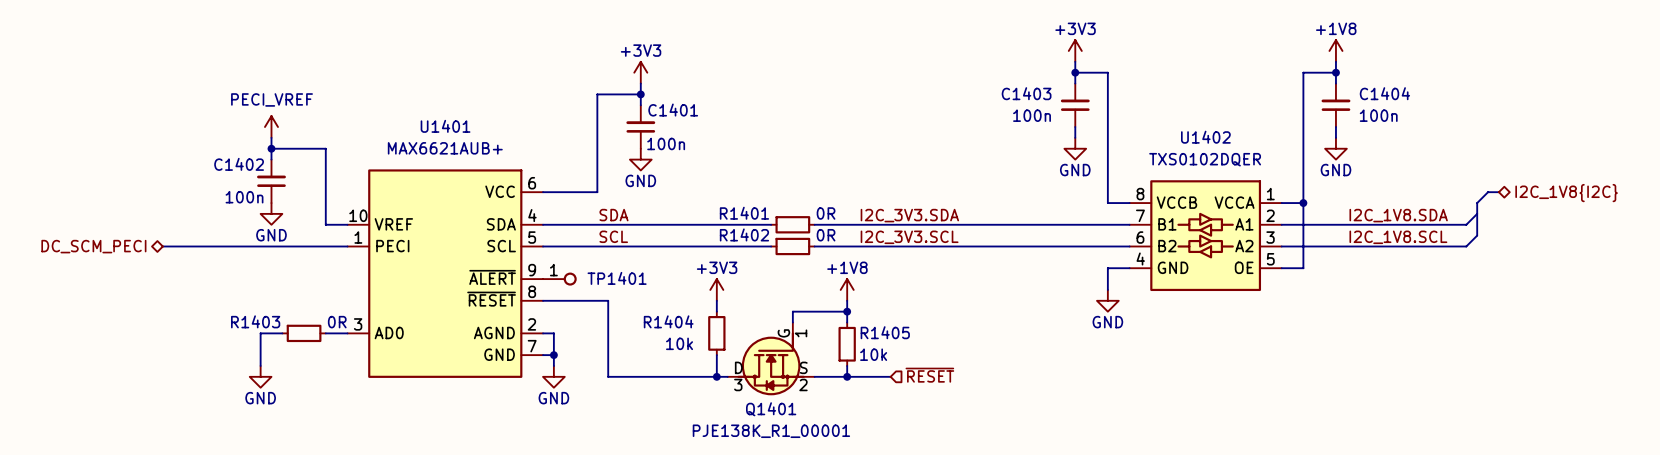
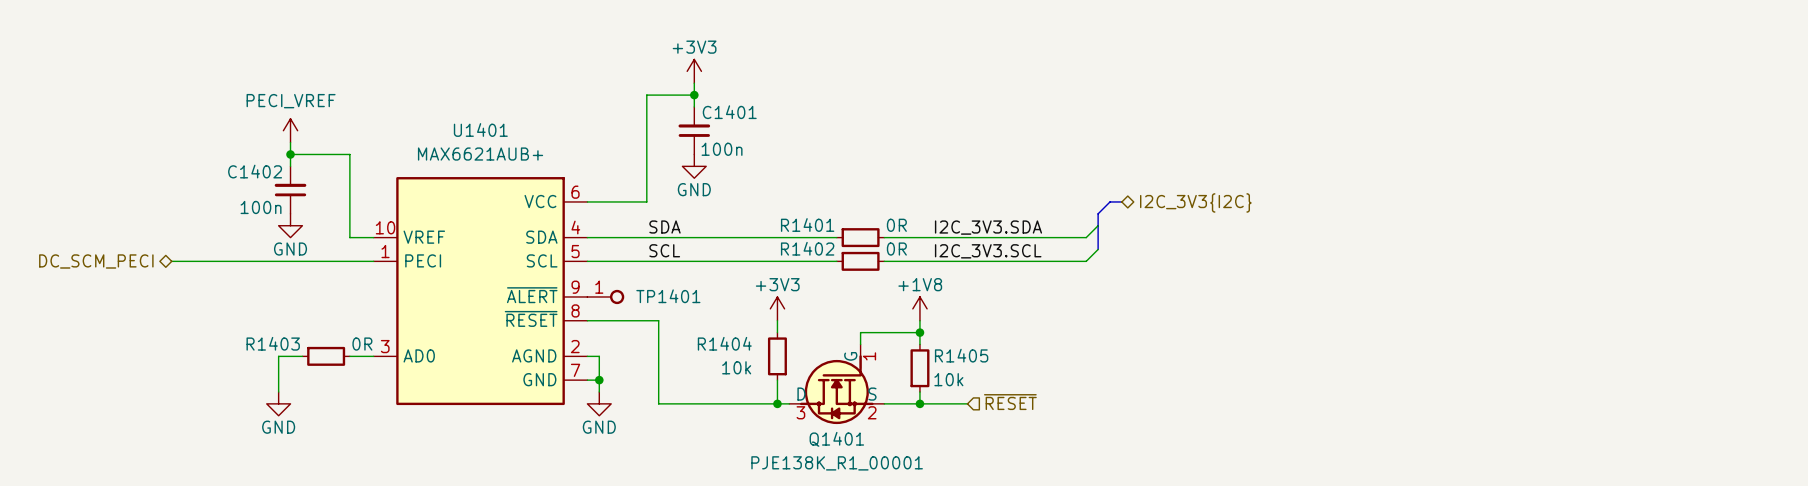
power symbol: +3V3 (1075, 50) -> none
power symbol: +1V8 (1335, 50) -> none
wire: (1075, 61) (1075, 83) -> none
wire: (1335, 61) (1335, 83) -> none
wire: (1075, 72) (1107, 72) (1107, 203) (1129, 203) -> none
junction: (1075, 72) -> none
wire: (1335, 72) (1303, 72) (1303, 268) (1281, 268) -> none
junction: (1335, 72) -> none
C1403: (1075, 105) -> none
C1404: (1335, 105) -> none
wire: (1075, 127) (1075, 137) -> none
wire: (1335, 127) (1335, 137) -> none
power symbol: GND (1075, 148) -> none
power symbol: GND (1335, 148) -> none
bus: none -> (1121, 201) (1109, 201) (1098, 213) (1098, 249)
bus: (1498, 192) (1488, 192) (1477, 203) (1477, 235) -> none
hierarchical label: none -> I2C_3V3{I2C} (1195, 202)
hierarchical label: I2C_1V8{I2C} (1566, 193) -> none
wire: (1281, 203) (1303, 203) -> none
junction: (1303, 203) -> none
wire: (1477, 213) (1466, 224) (1281, 224) -> none
label: I2C_1V8.SDA (1398, 215) -> none
wire: (999, 224) (1129, 224) -> (1086, 237) (1098, 225)
U1402: (1205, 235) -> none
wire: (1477, 235) (1466, 246) (1281, 246) -> none
label: I2C_1V8.SCL (1398, 237) -> none
wire: (999, 246) (1129, 246) -> (1086, 261) (1098, 249)
wire: (1129, 268) (1107, 268) (1107, 289) -> none
power symbol: GND (1107, 300) -> none

